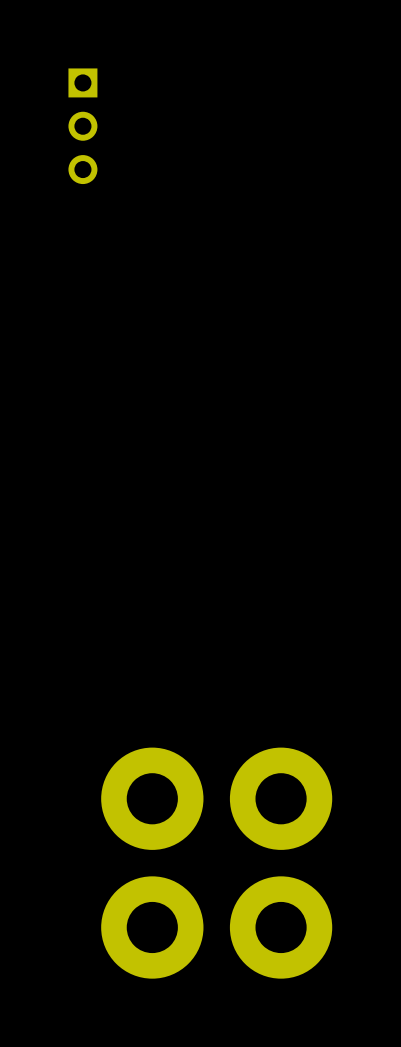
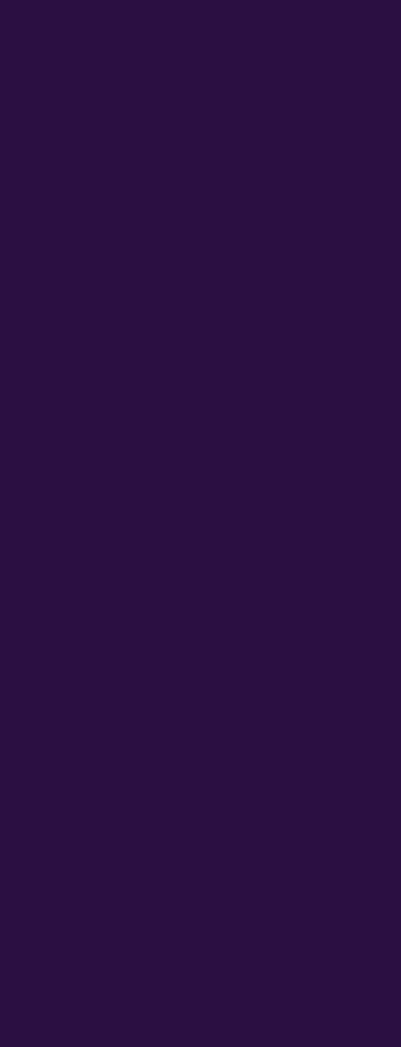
part: (82, 126) -> none
part: (152, 798) -> none
part: (281, 798) -> none
part: (152, 927) -> none
part: (281, 927) -> none

